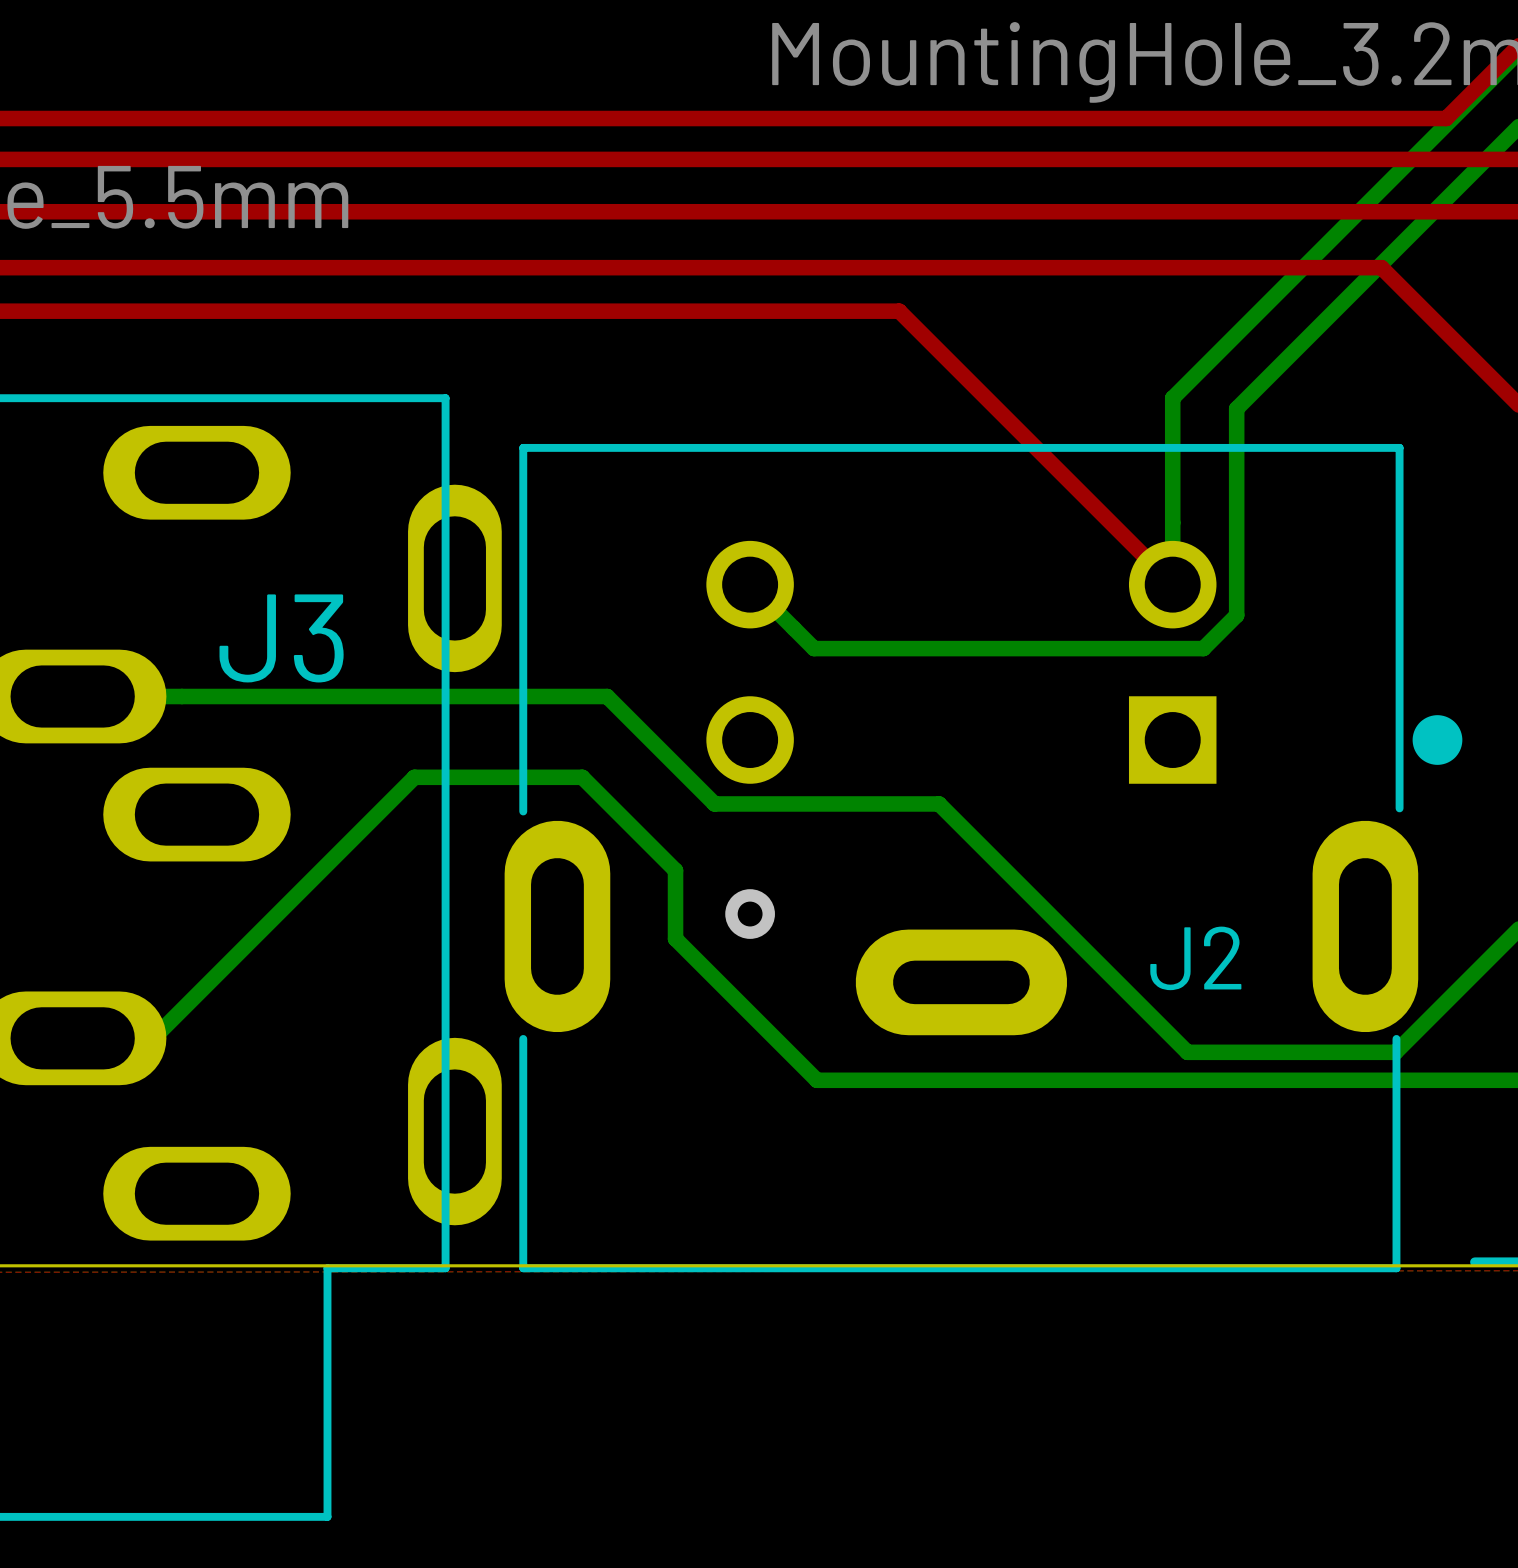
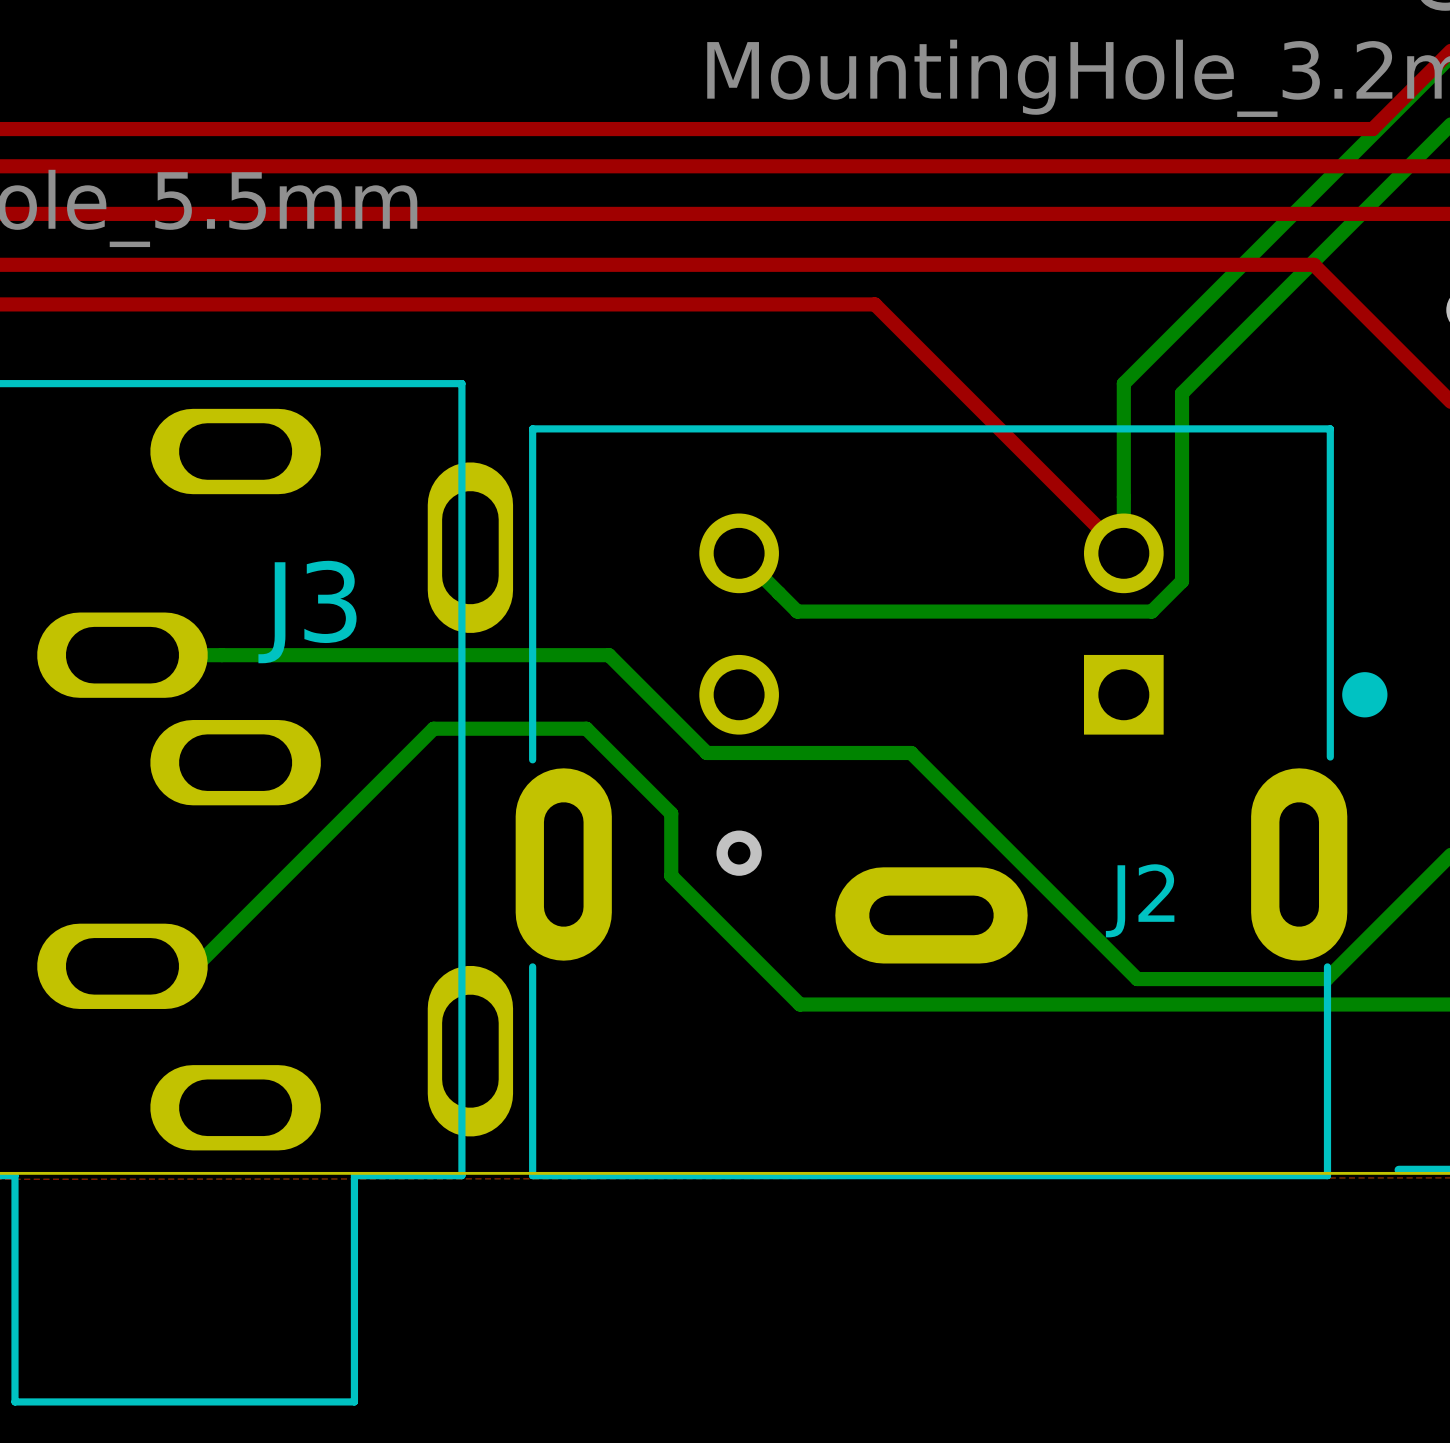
J2 footprint: [504, 443, 1463, 1273] -> [515, 425, 1388, 1180]

